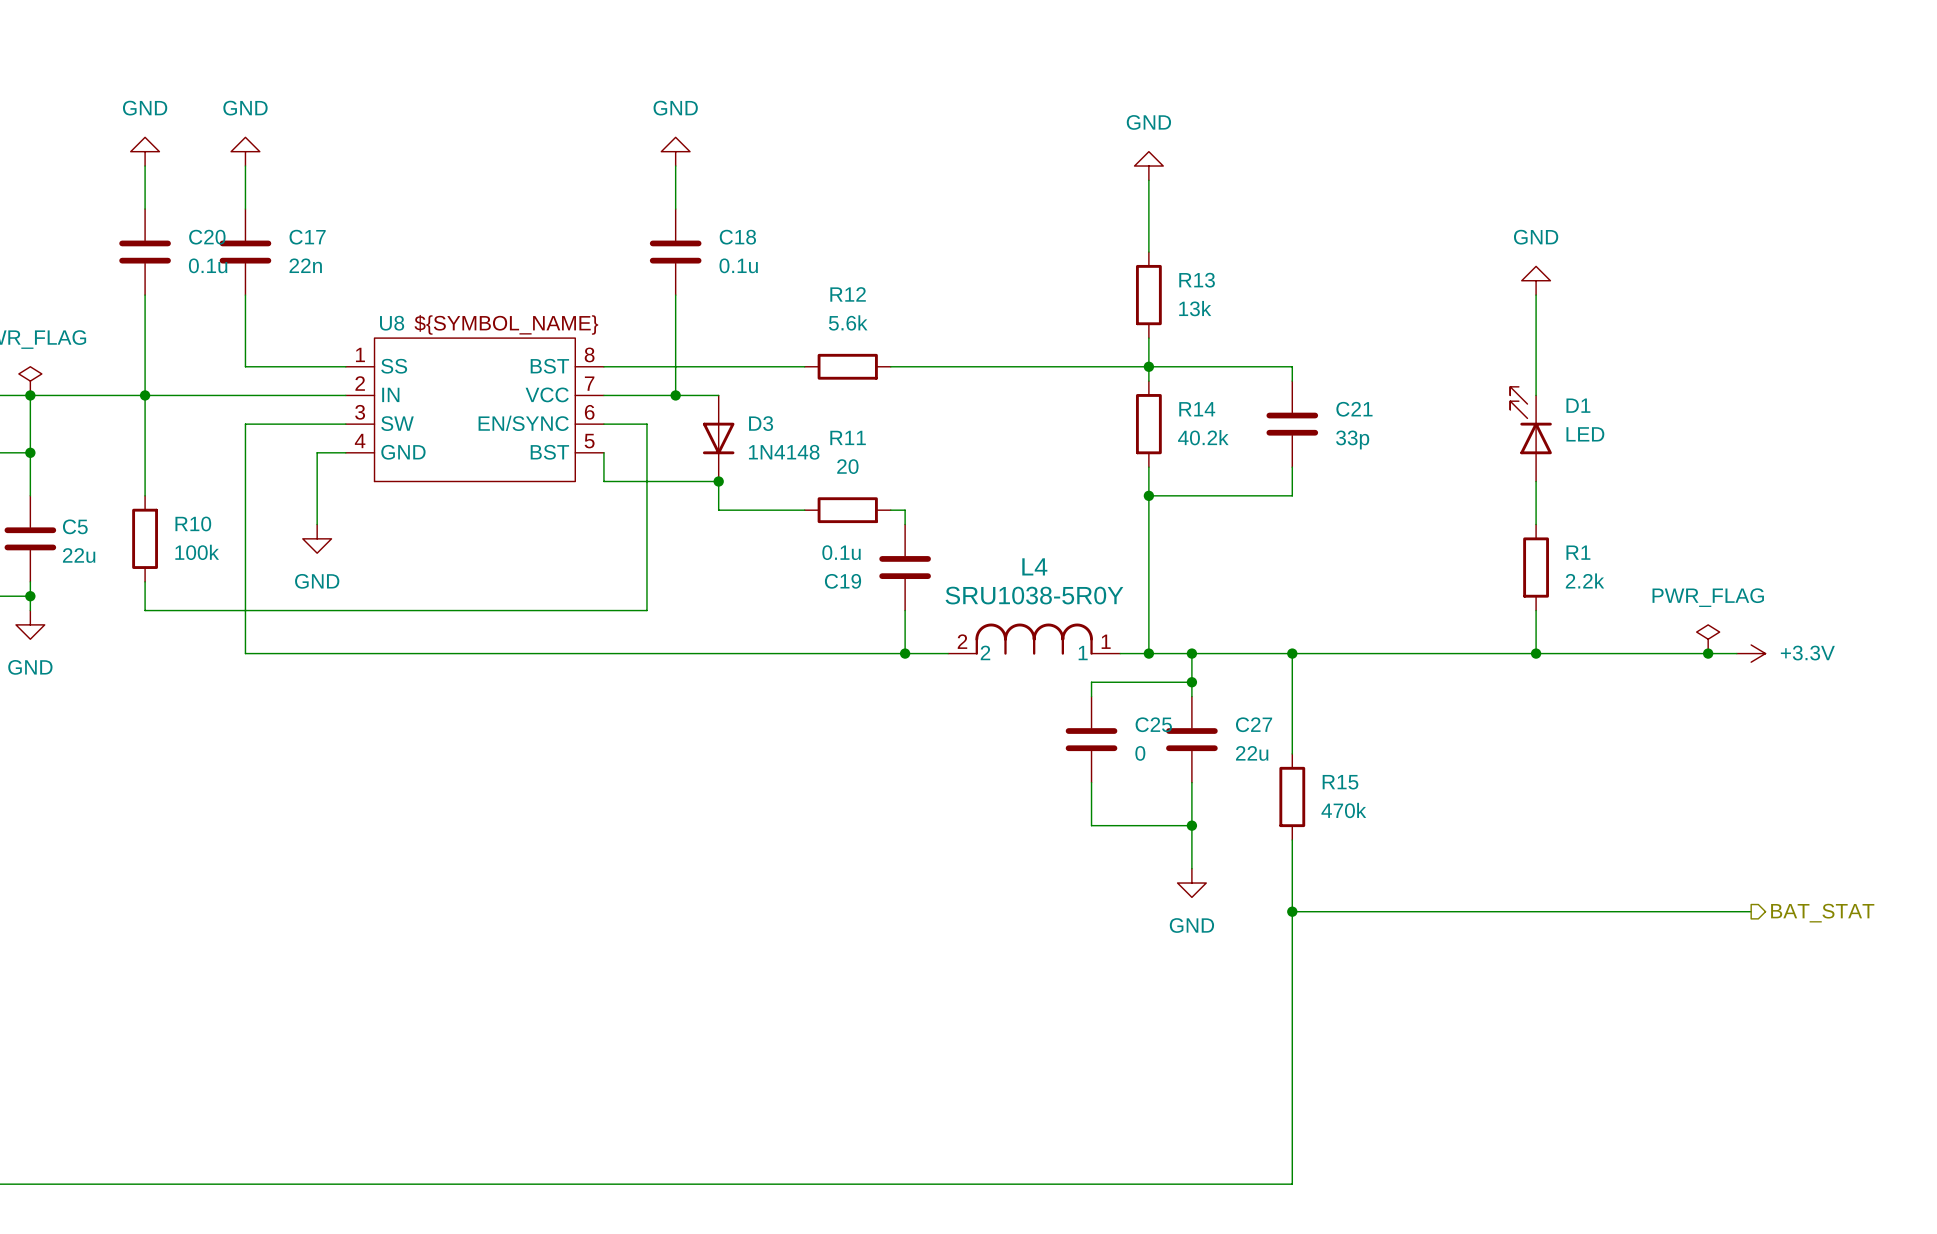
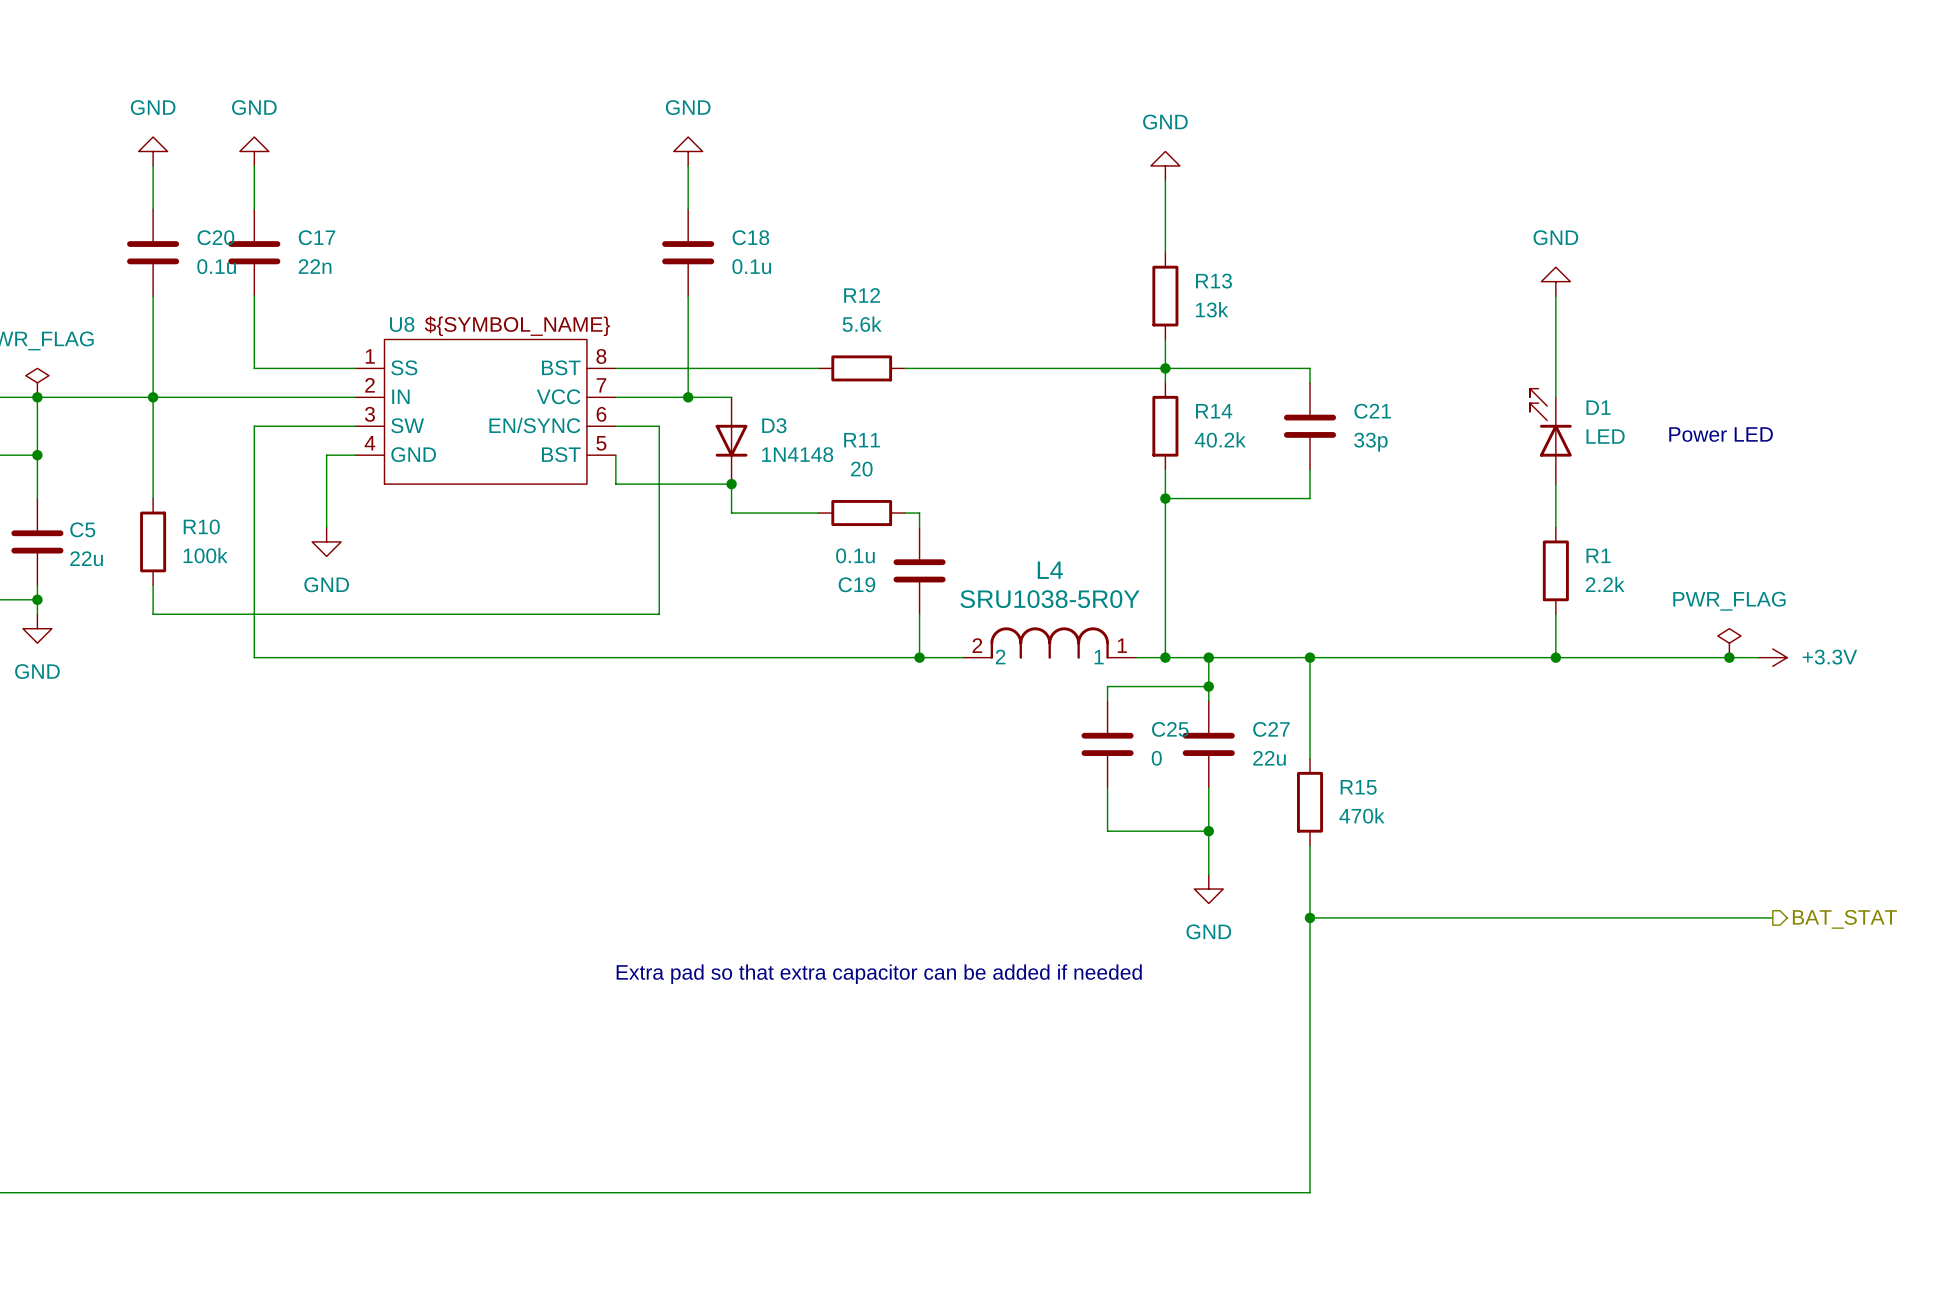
text: none -> Power LED (1721, 434)
text: none -> Extra pad so that extra capacitor can be added if needed (879, 974)

